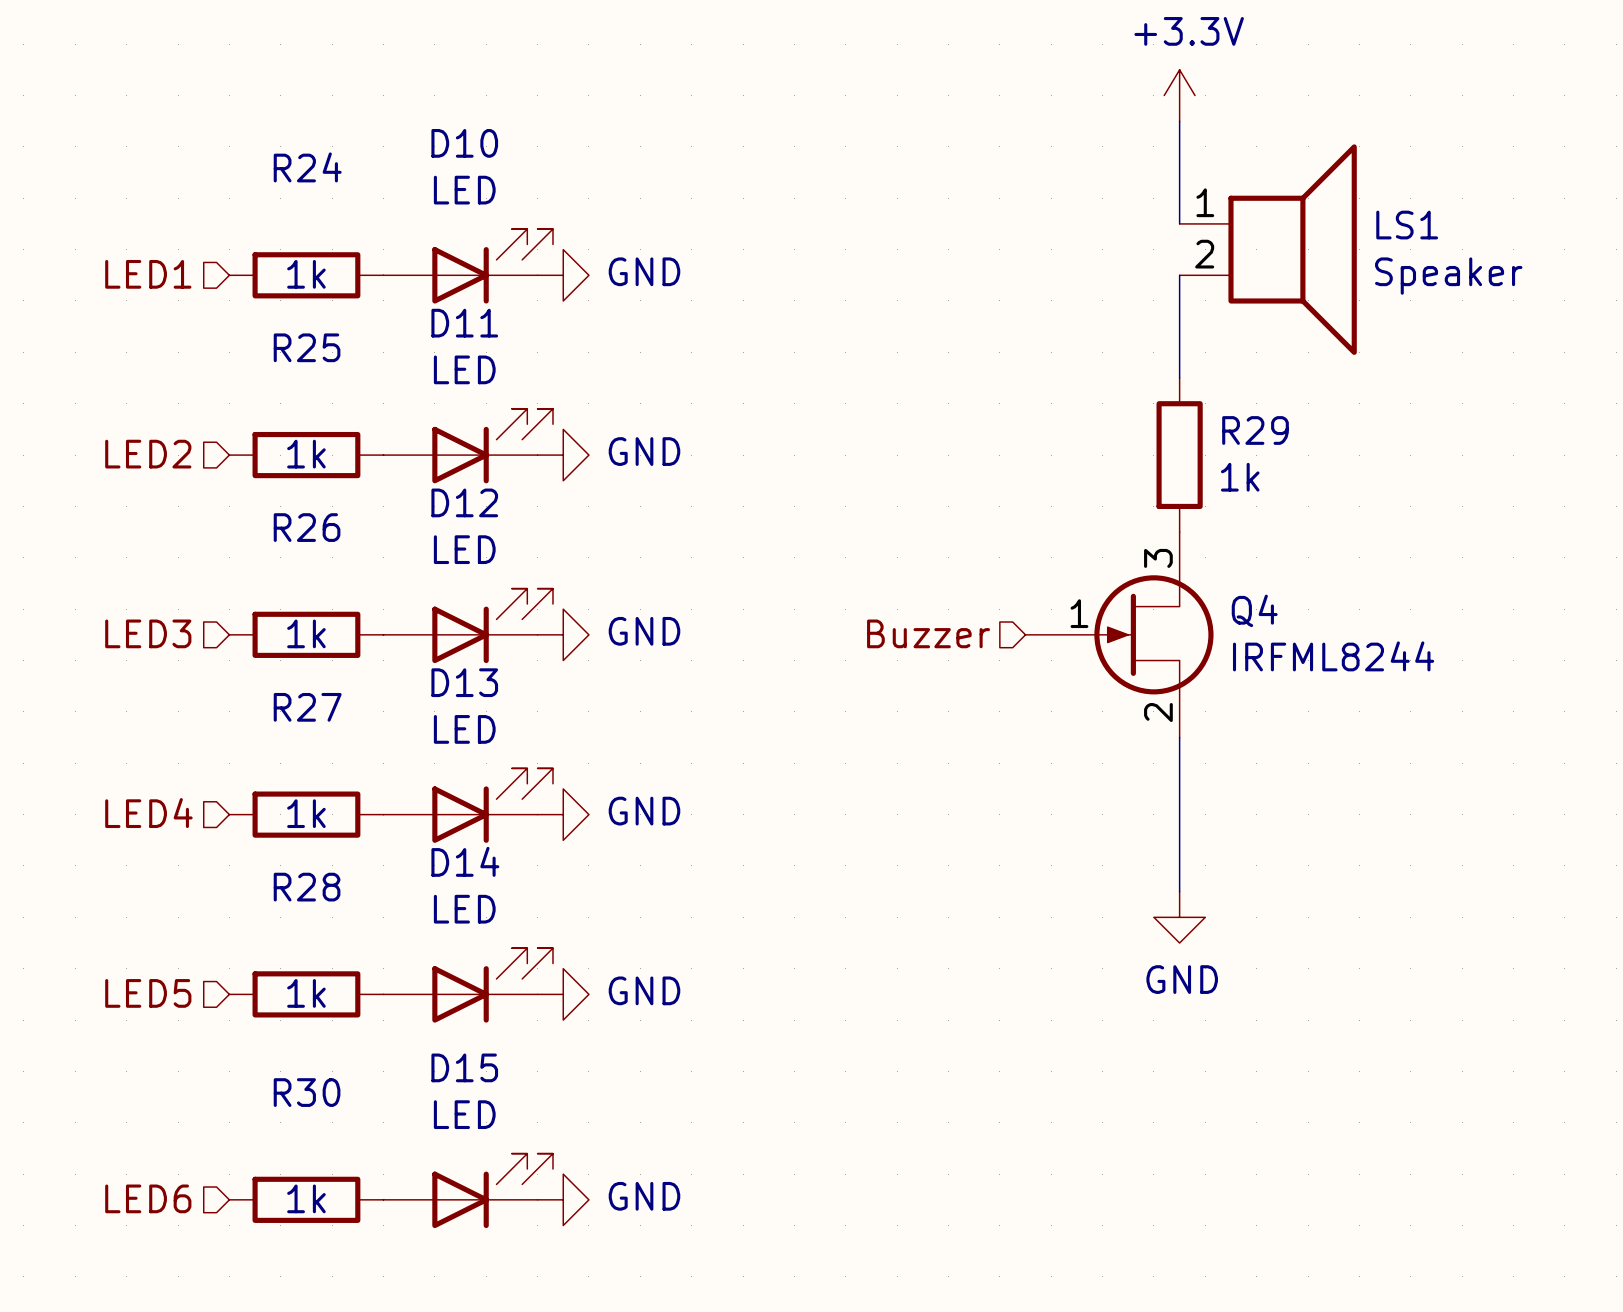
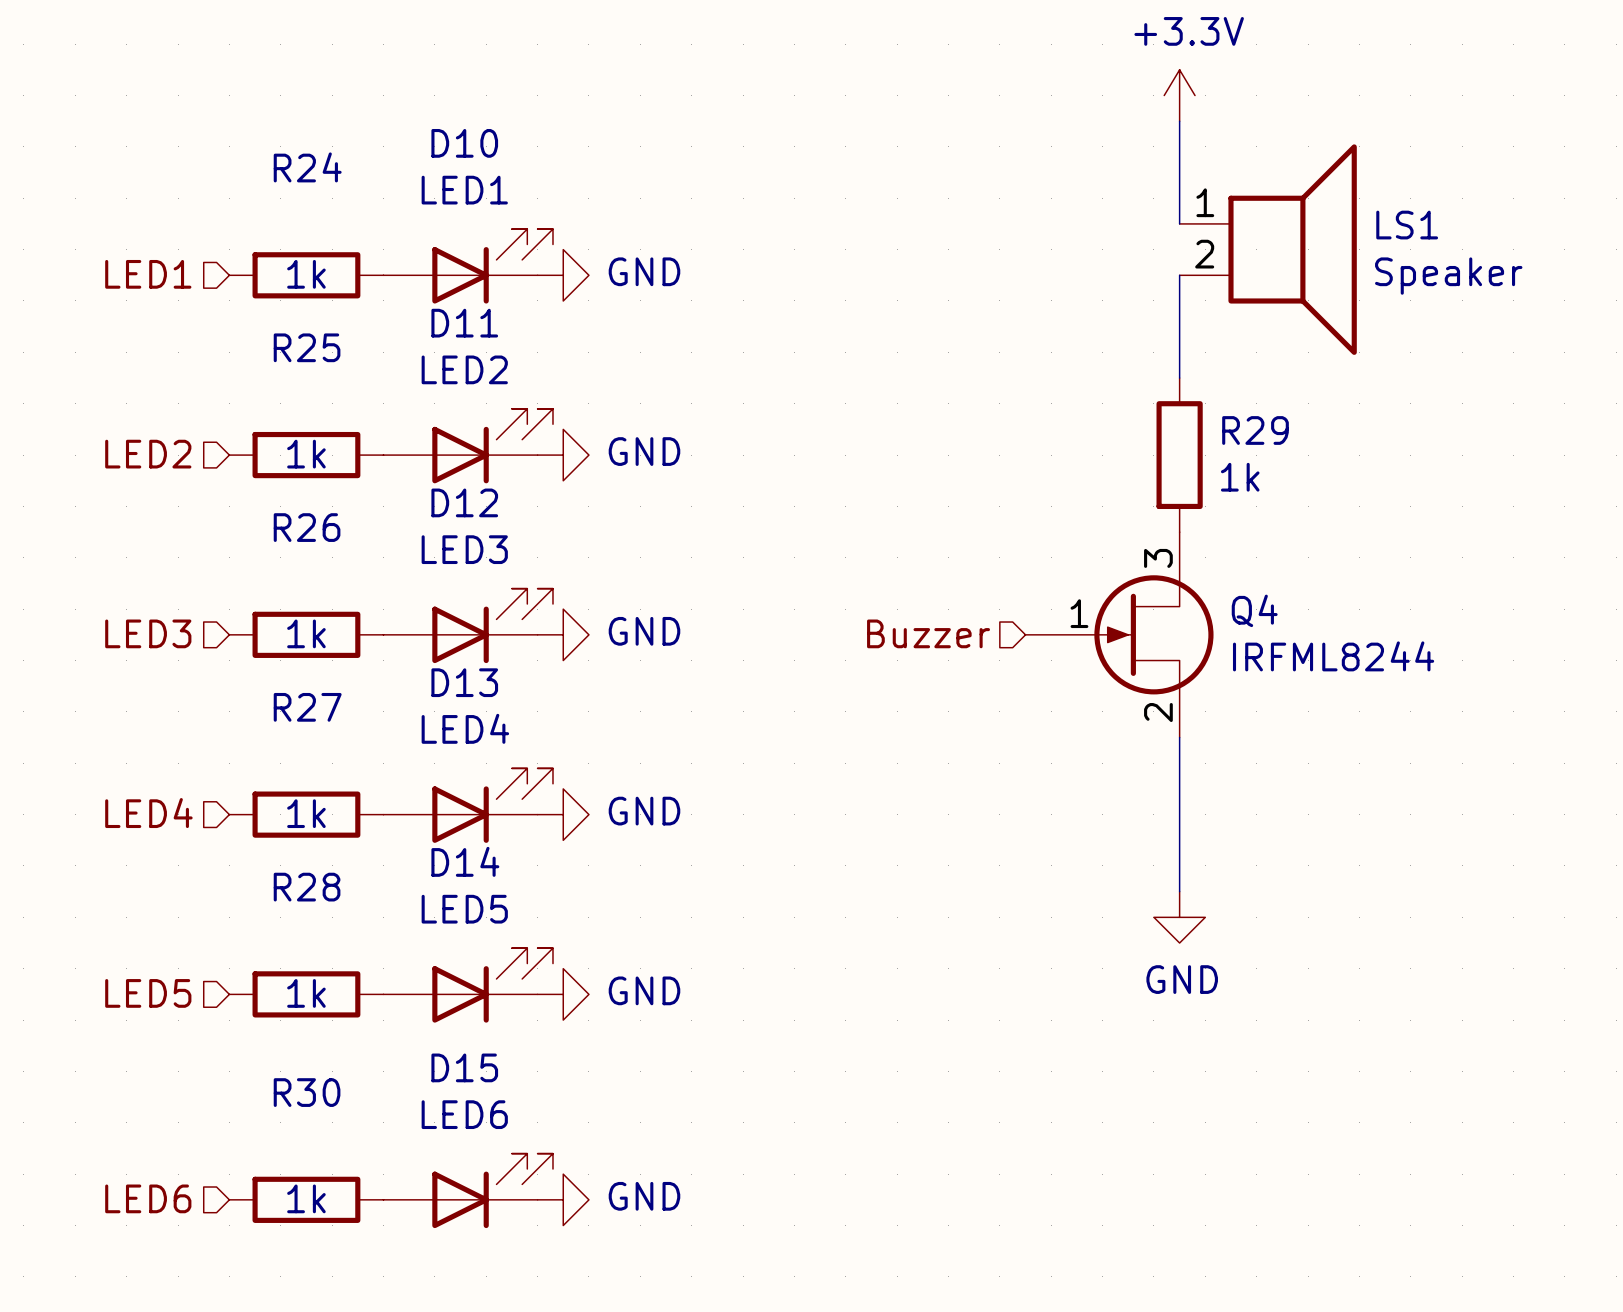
D10 value: LED (464, 190) -> LED1 (464, 190)
D11 value: LED (464, 369) -> LED2 (464, 369)
D12 value: LED (464, 549) -> LED3 (464, 549)
D13 value: LED (464, 729) -> LED4 (465, 728)
D14 value: LED (464, 909) -> LED5 (464, 909)
D15 value: LED (464, 1114) -> LED6 (464, 1114)

